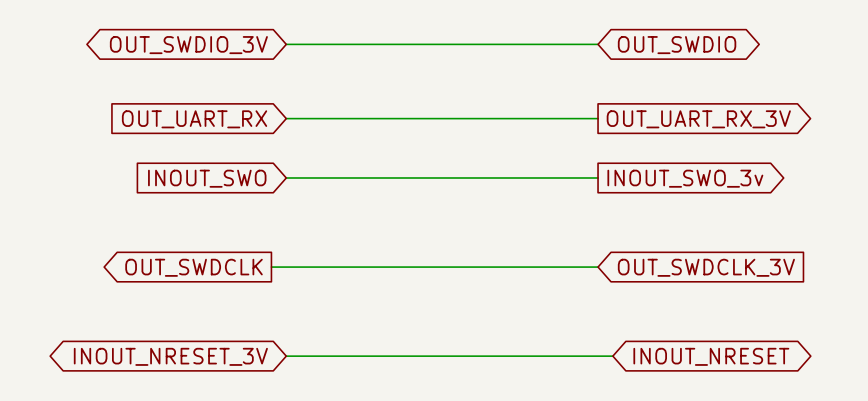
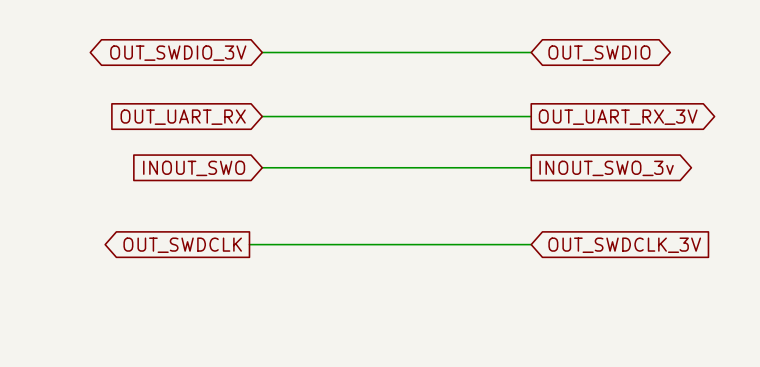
global label: INOUT_NRESET_3V (170, 356) -> none
wire: (286, 356) (612, 356) -> none
global label: INOUT_NRESET (711, 356) -> none

